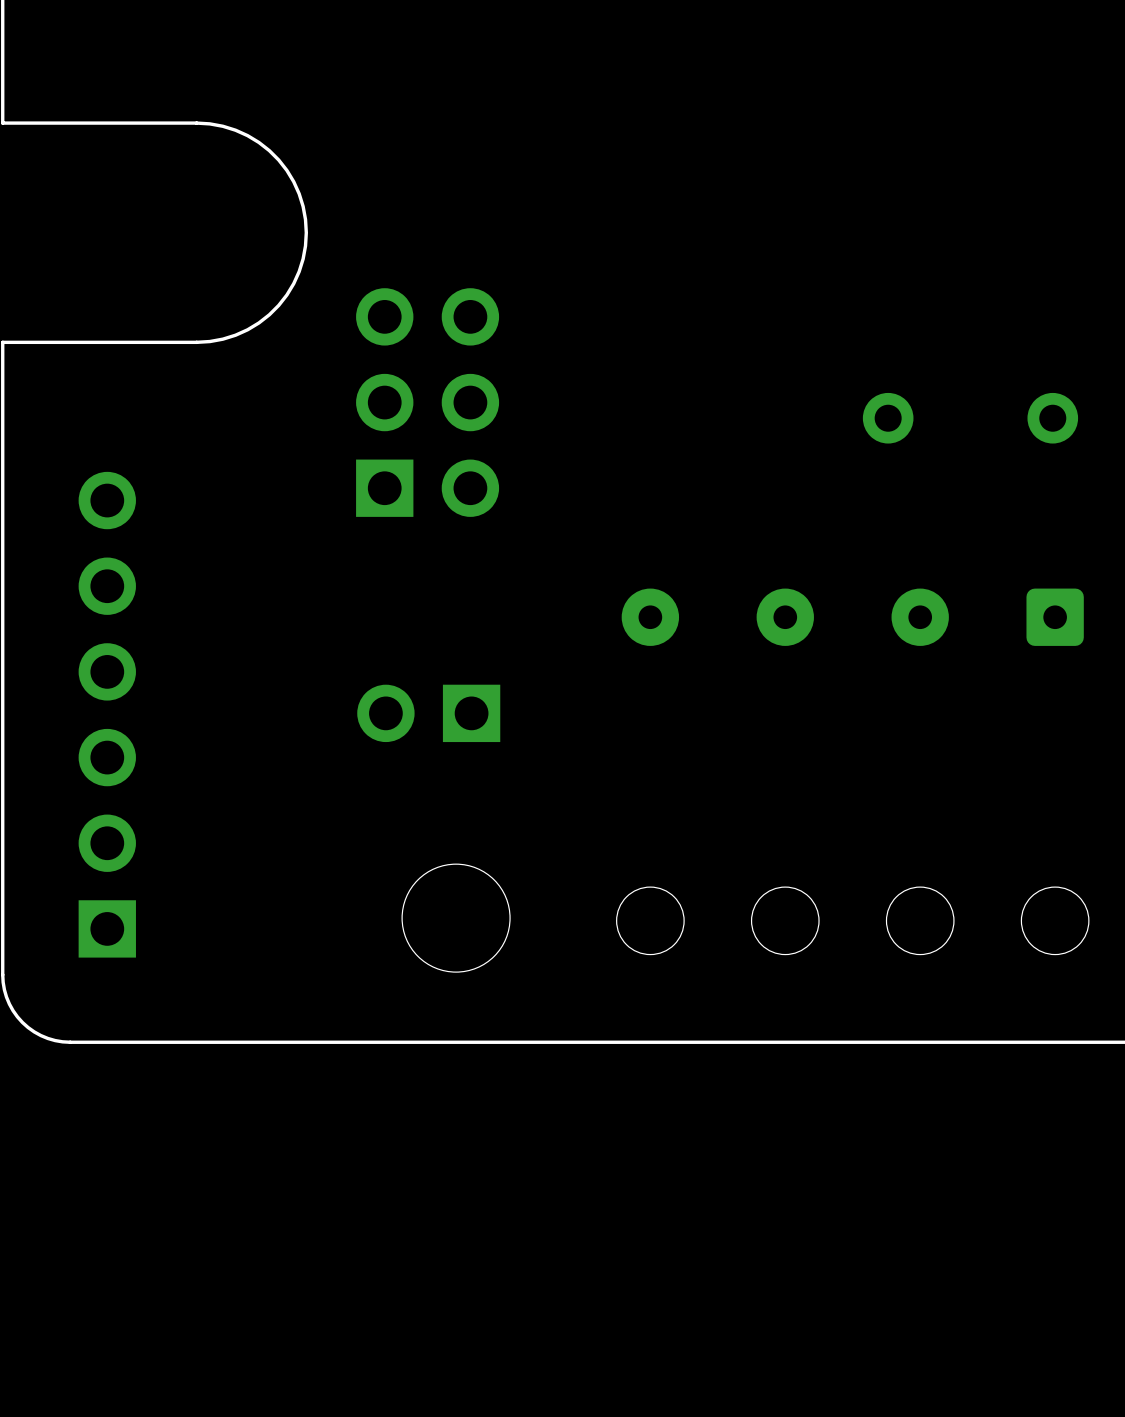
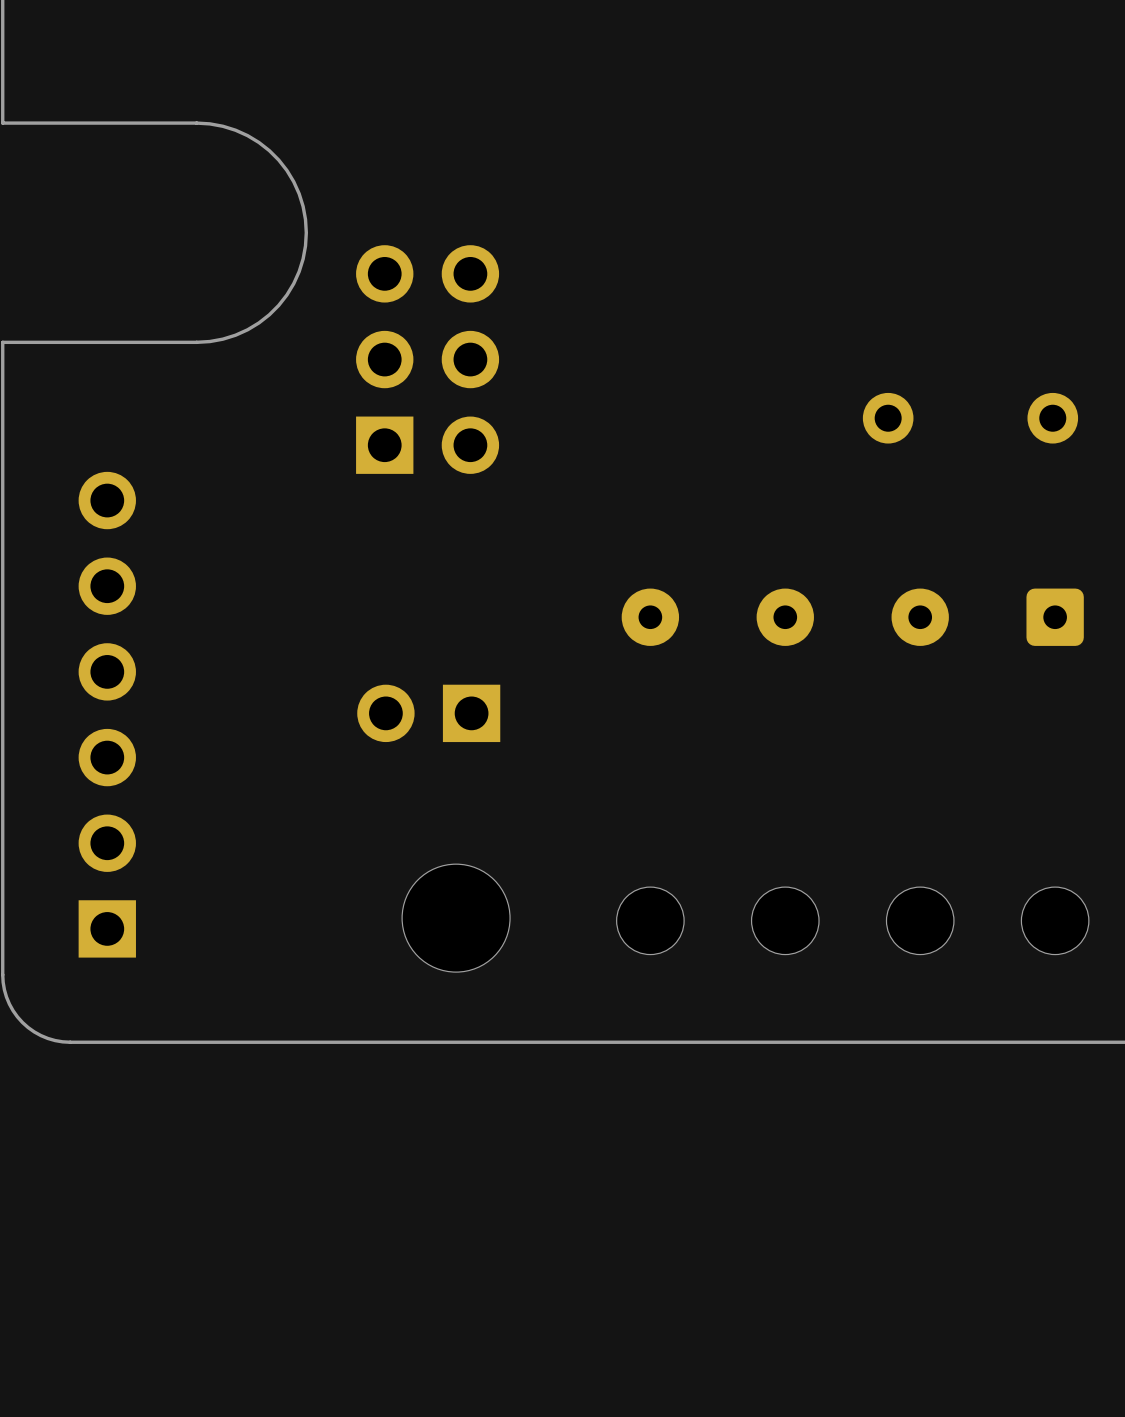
part position: (427, 402) -> (427, 359)

